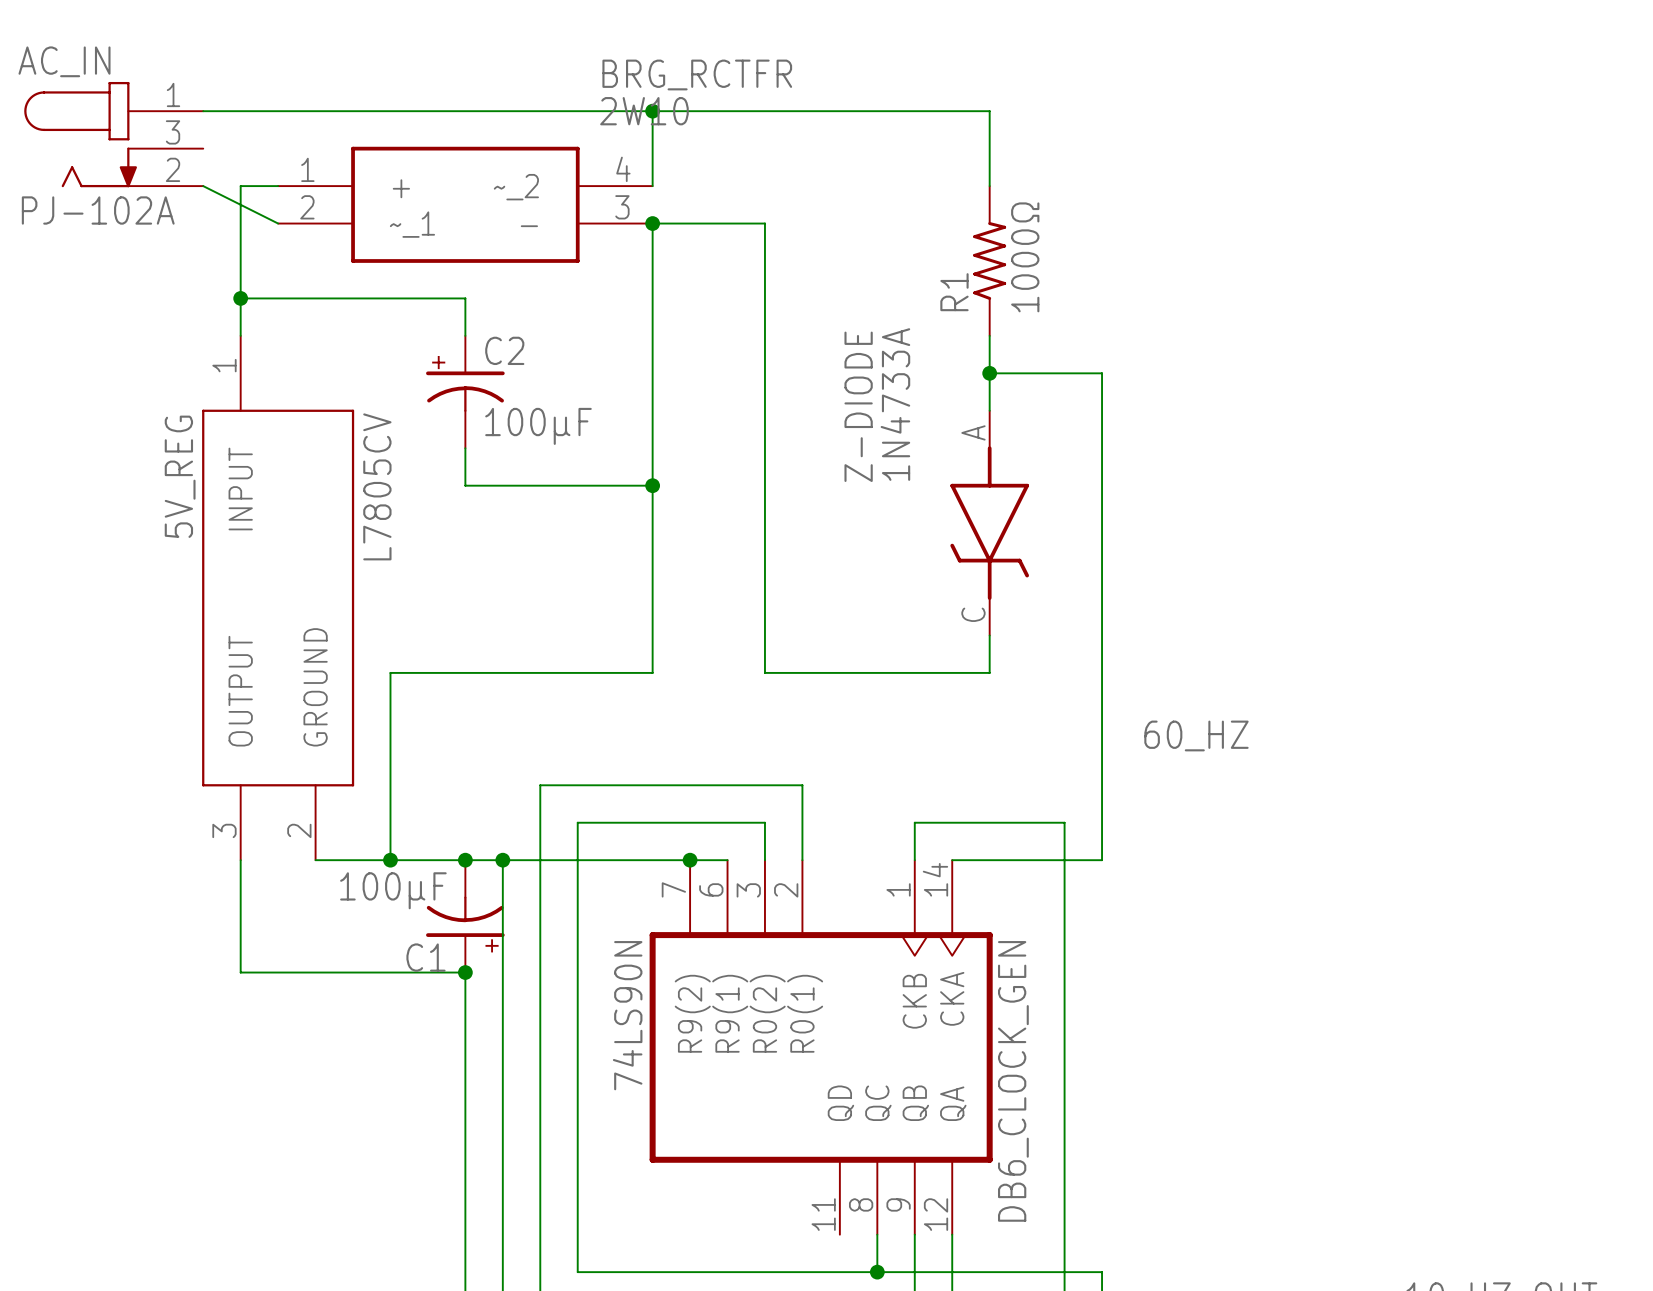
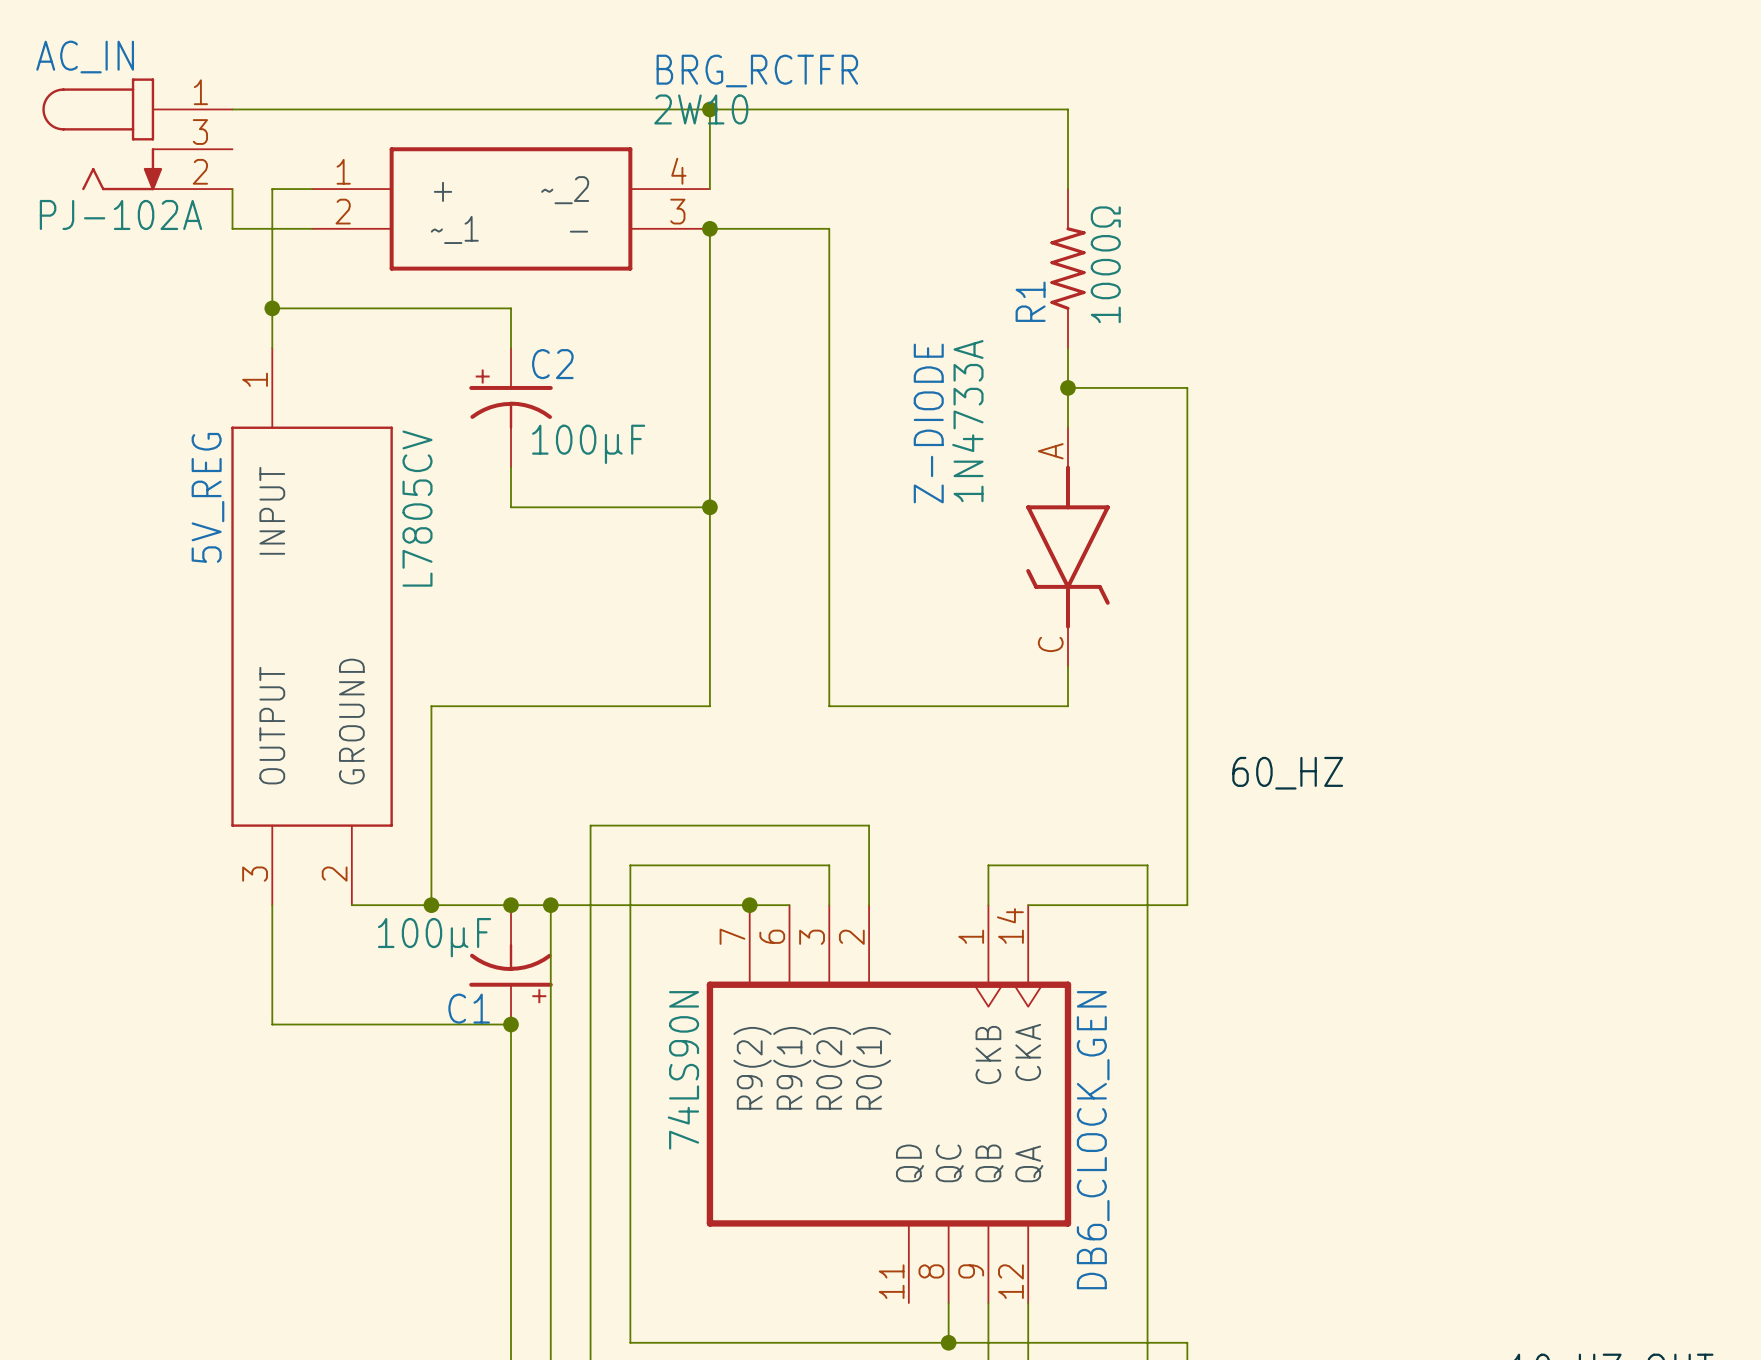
wire: (203, 186) (278, 223) -> (232, 189) (232, 228) (312, 228)

